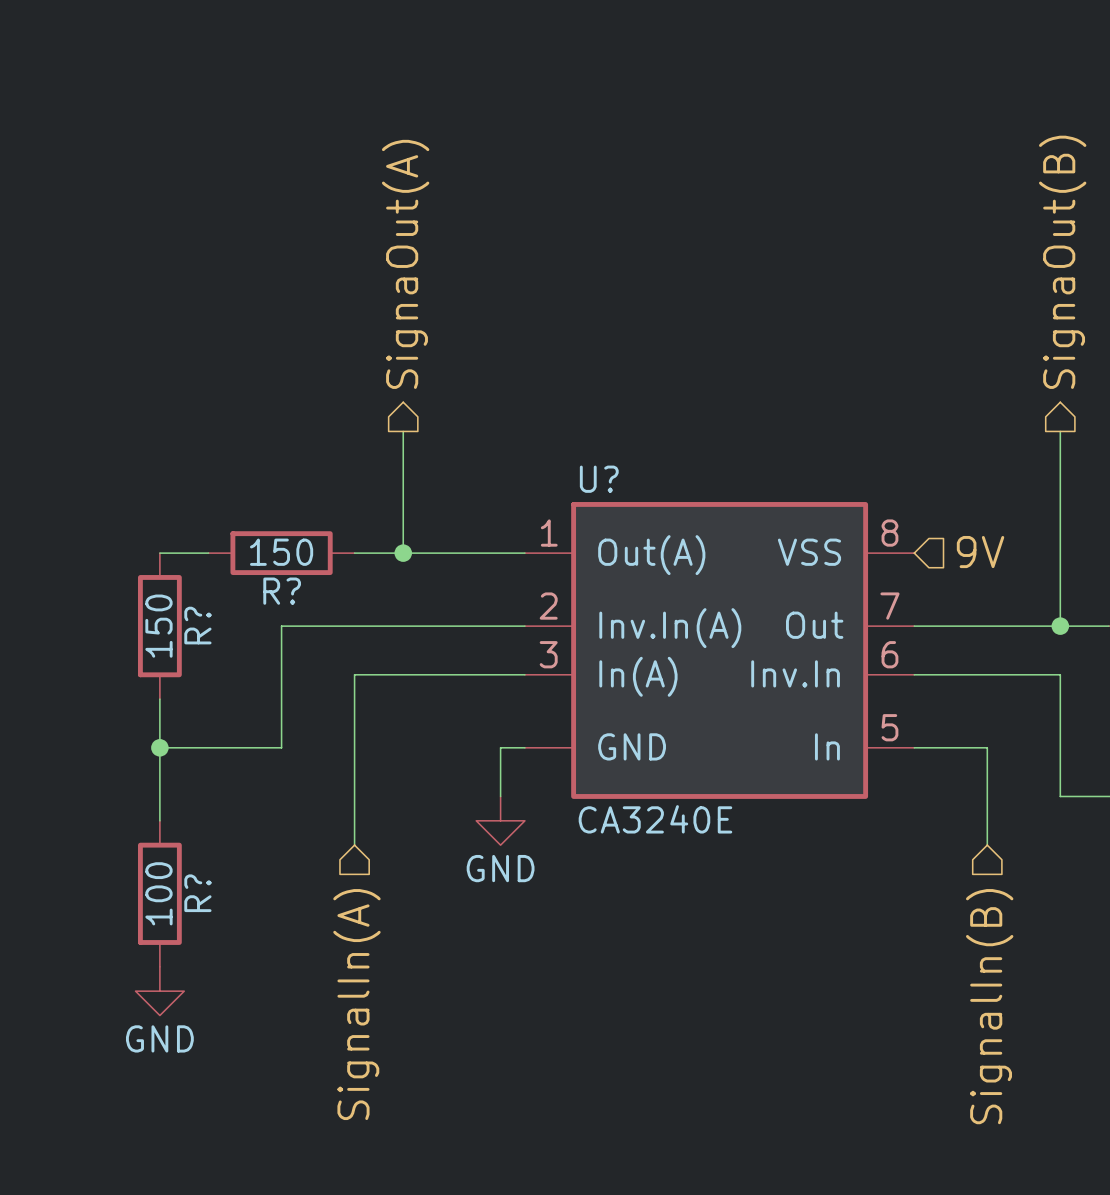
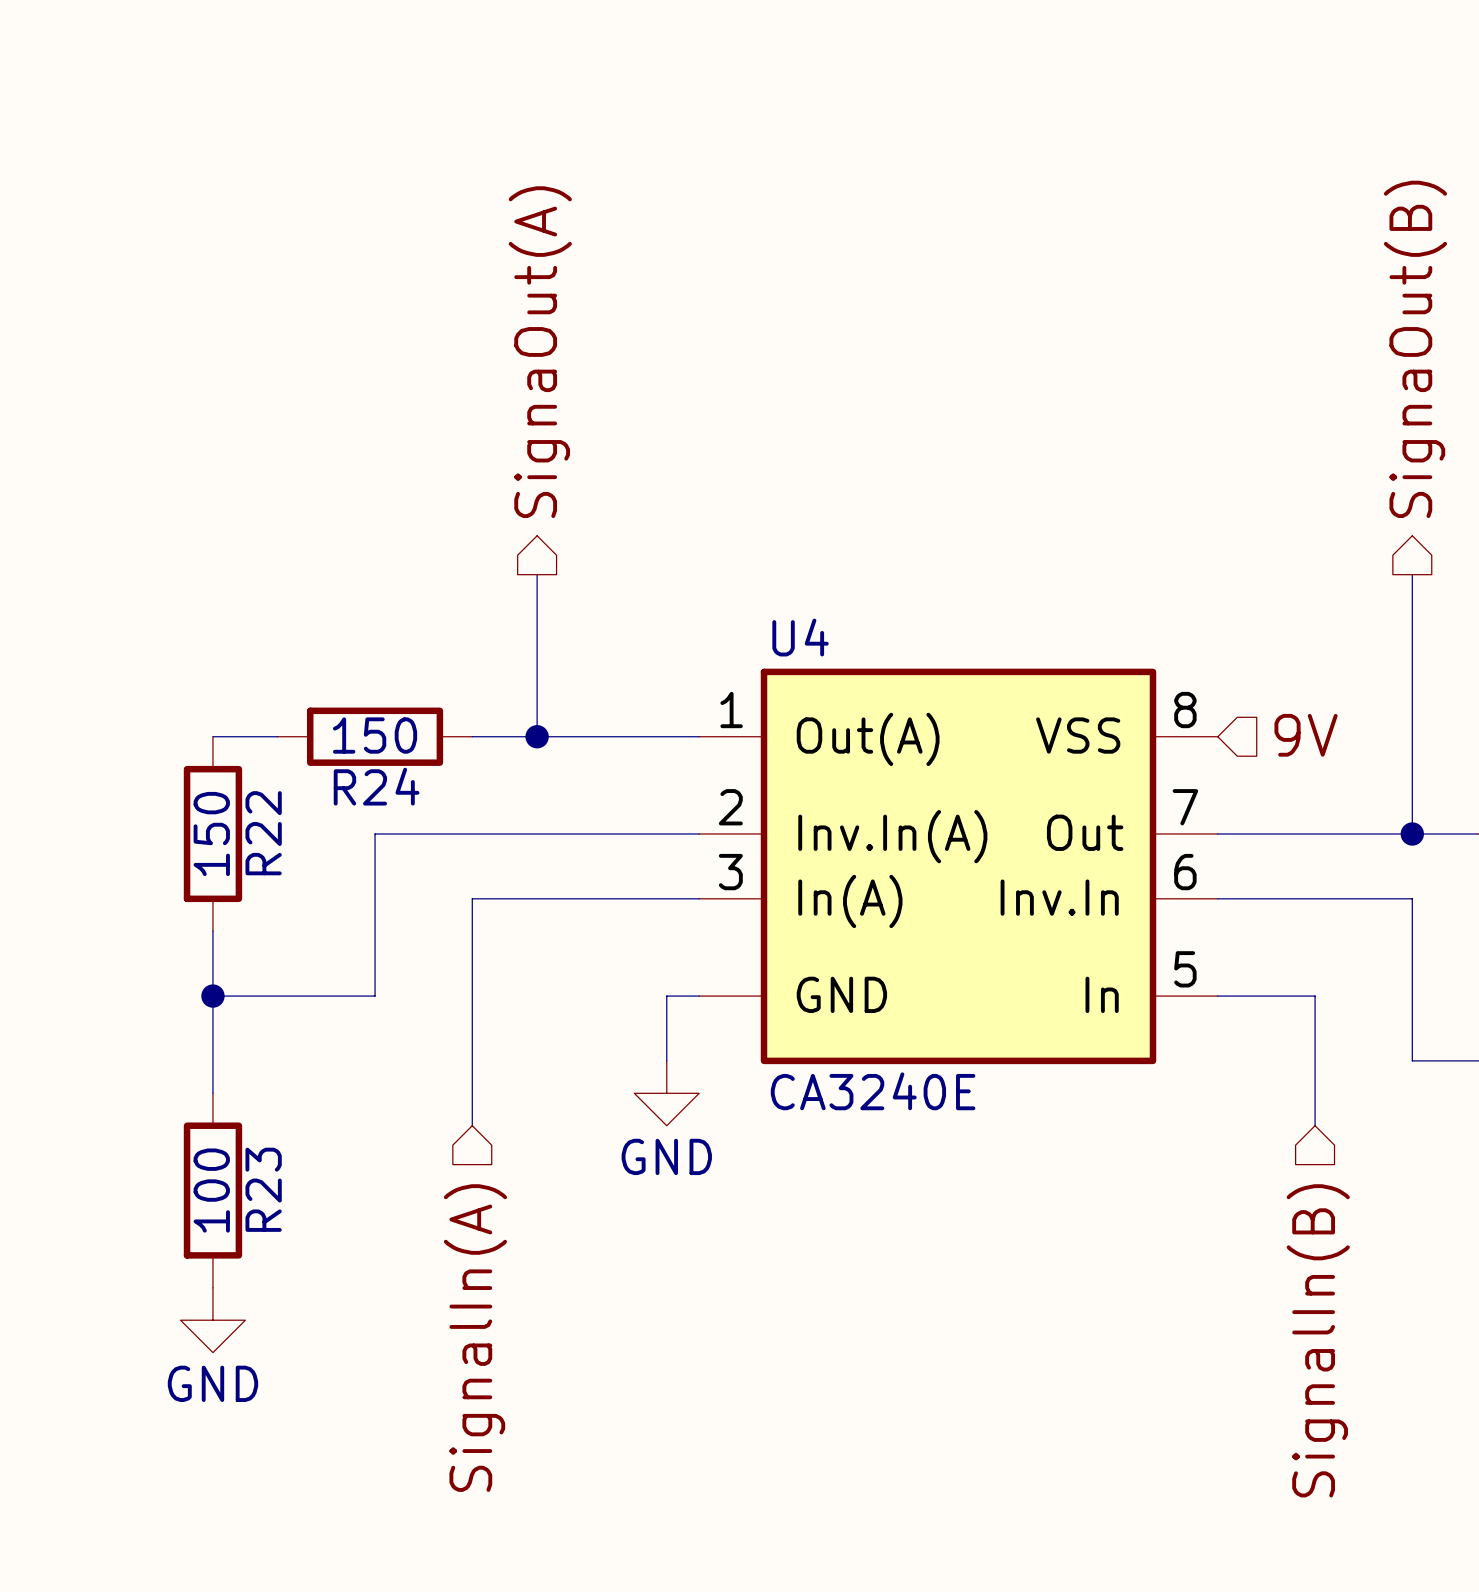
U? name: U? (599, 479) -> U4 (800, 637)
R? name: R? (282, 591) -> R24 (376, 786)
R? name: R? (197, 625) -> R22 (263, 833)
R? name: R? (197, 893) -> R23 (263, 1189)

